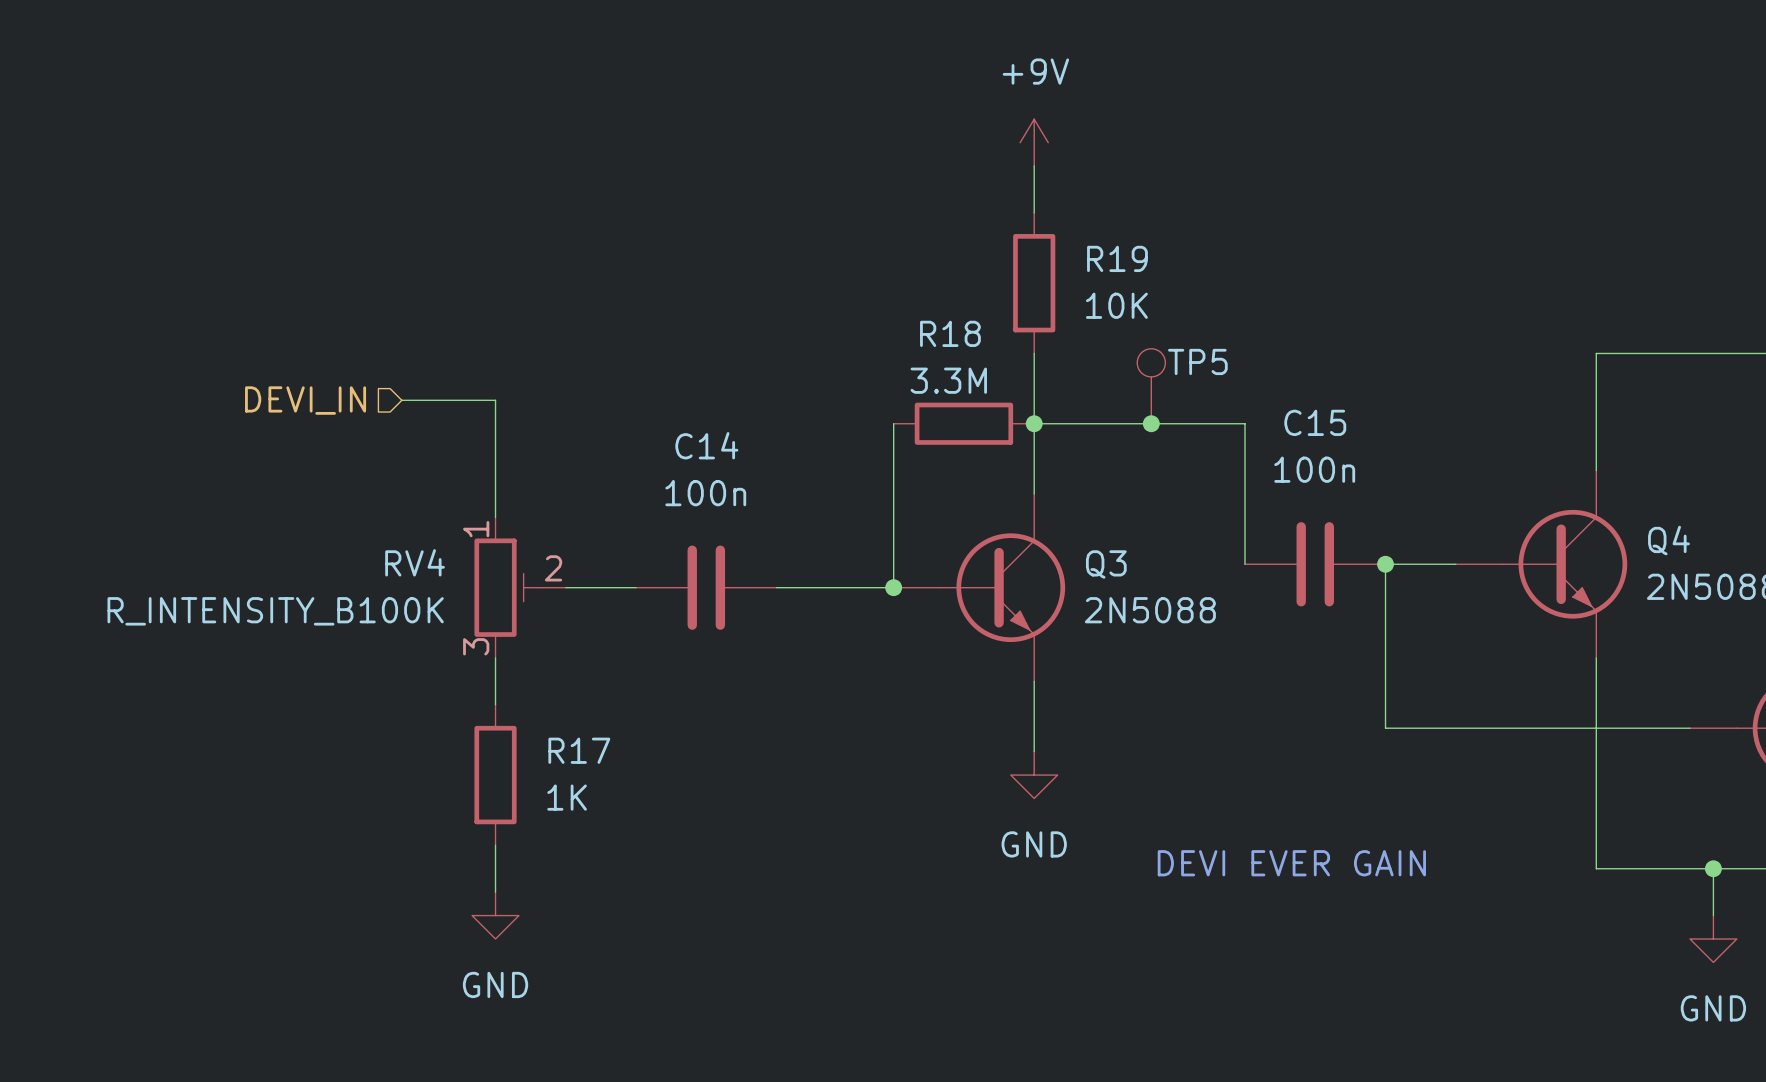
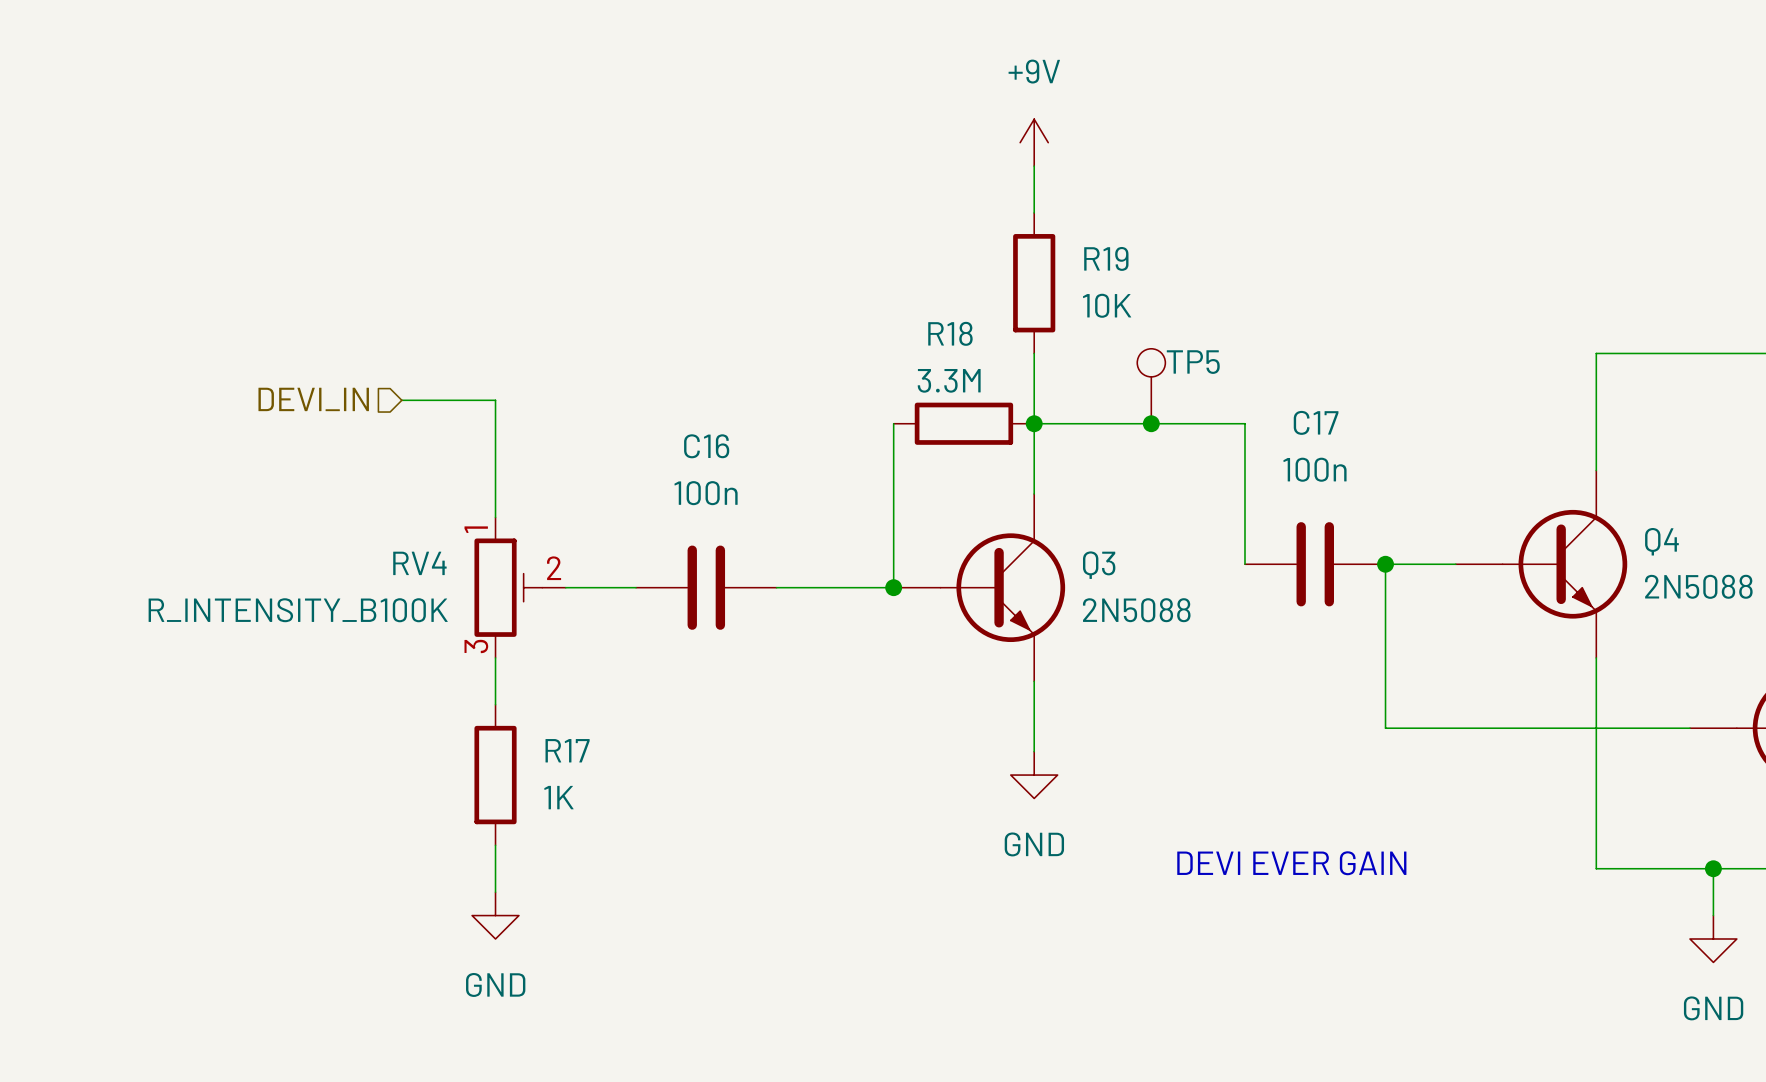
C15 name: C15 (1315, 422) -> C17 (1316, 422)
C14 name: C14 (706, 445) -> C16 (706, 446)

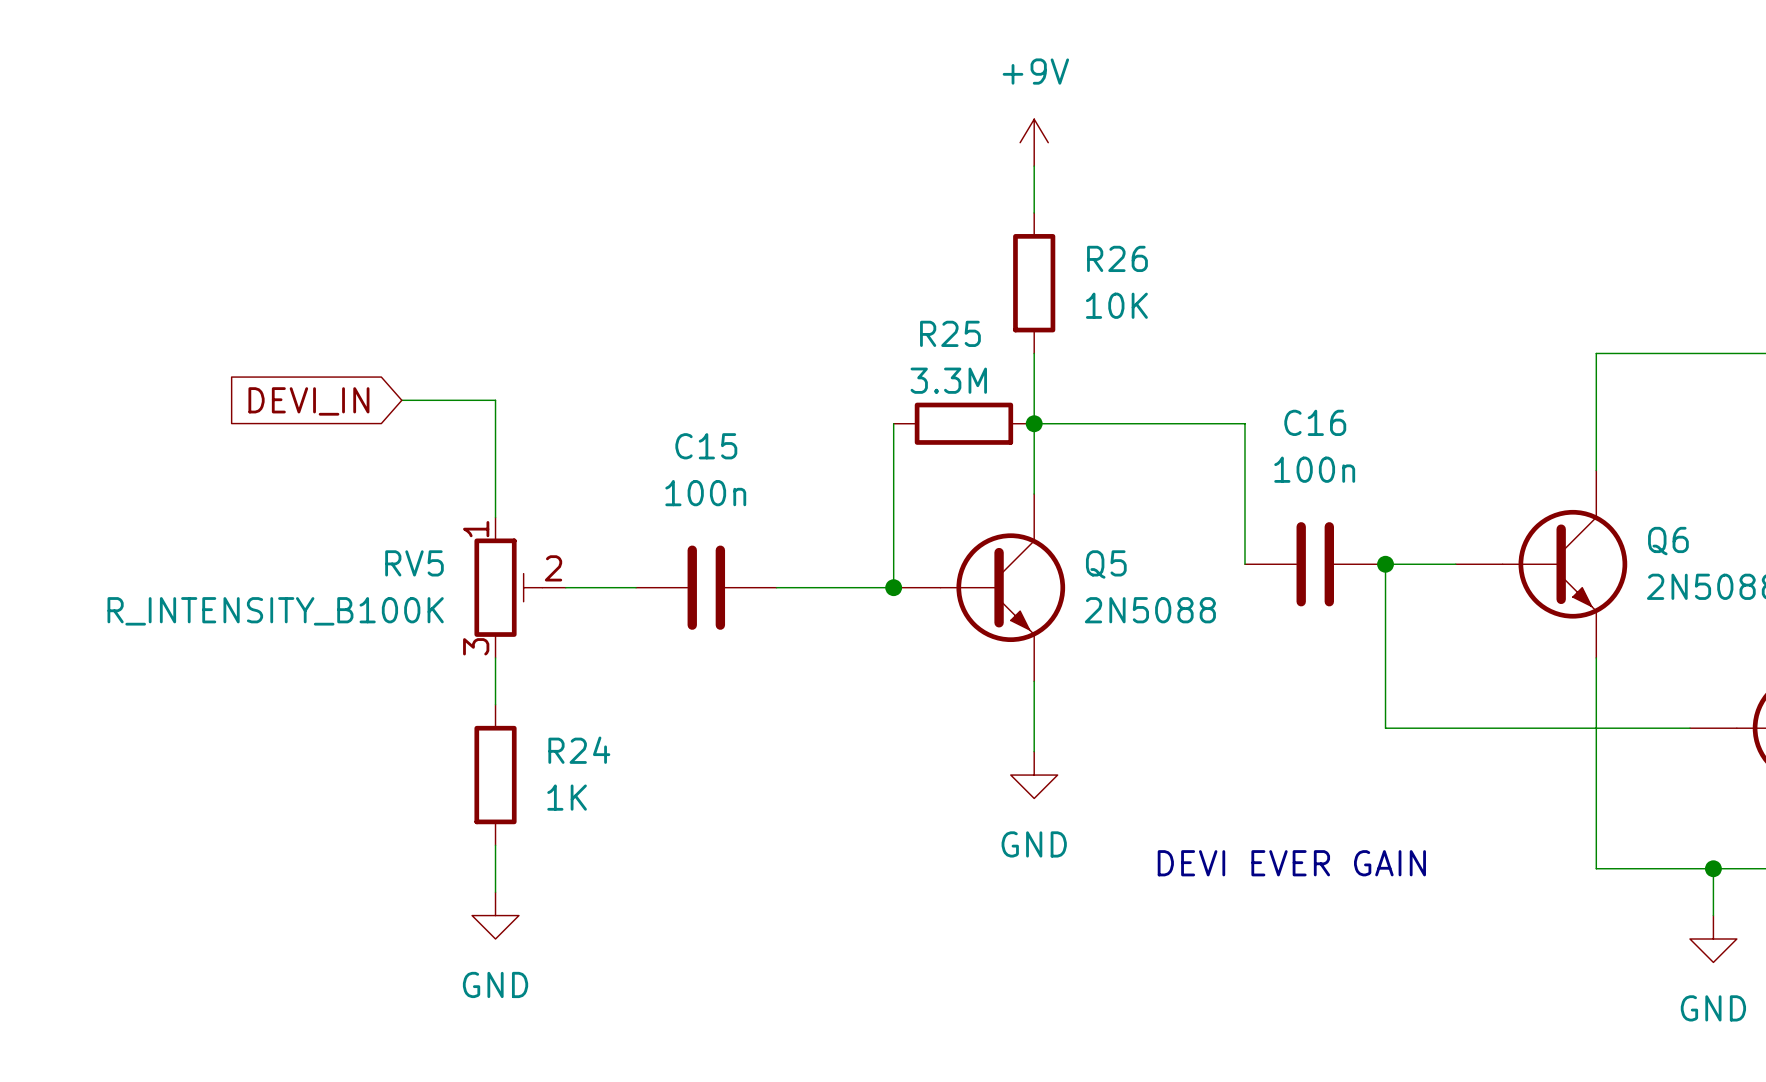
R19 name: R19 (1106, 258) -> R26 (1117, 258)
R18 name: R18 (950, 333) -> R25 (950, 333)
TP5: (1151, 386) -> none
hierarchical label: DEVI_IN (313, 399) -> none
global label: none -> DEVI_IN (308, 401)
C17 name: C17 (1316, 422) -> C16 (1315, 422)
junction: (1151, 423) -> none
C16 name: C16 (706, 446) -> C15 (706, 446)
Q4 name: Q4 (1661, 541) -> Q6 (1668, 541)
RV4 name: RV4 (419, 563) -> RV5 (414, 563)
Q3 name: Q3 (1099, 565) -> Q5 (1106, 564)
R17 name: R17 (567, 750) -> R24 (579, 750)

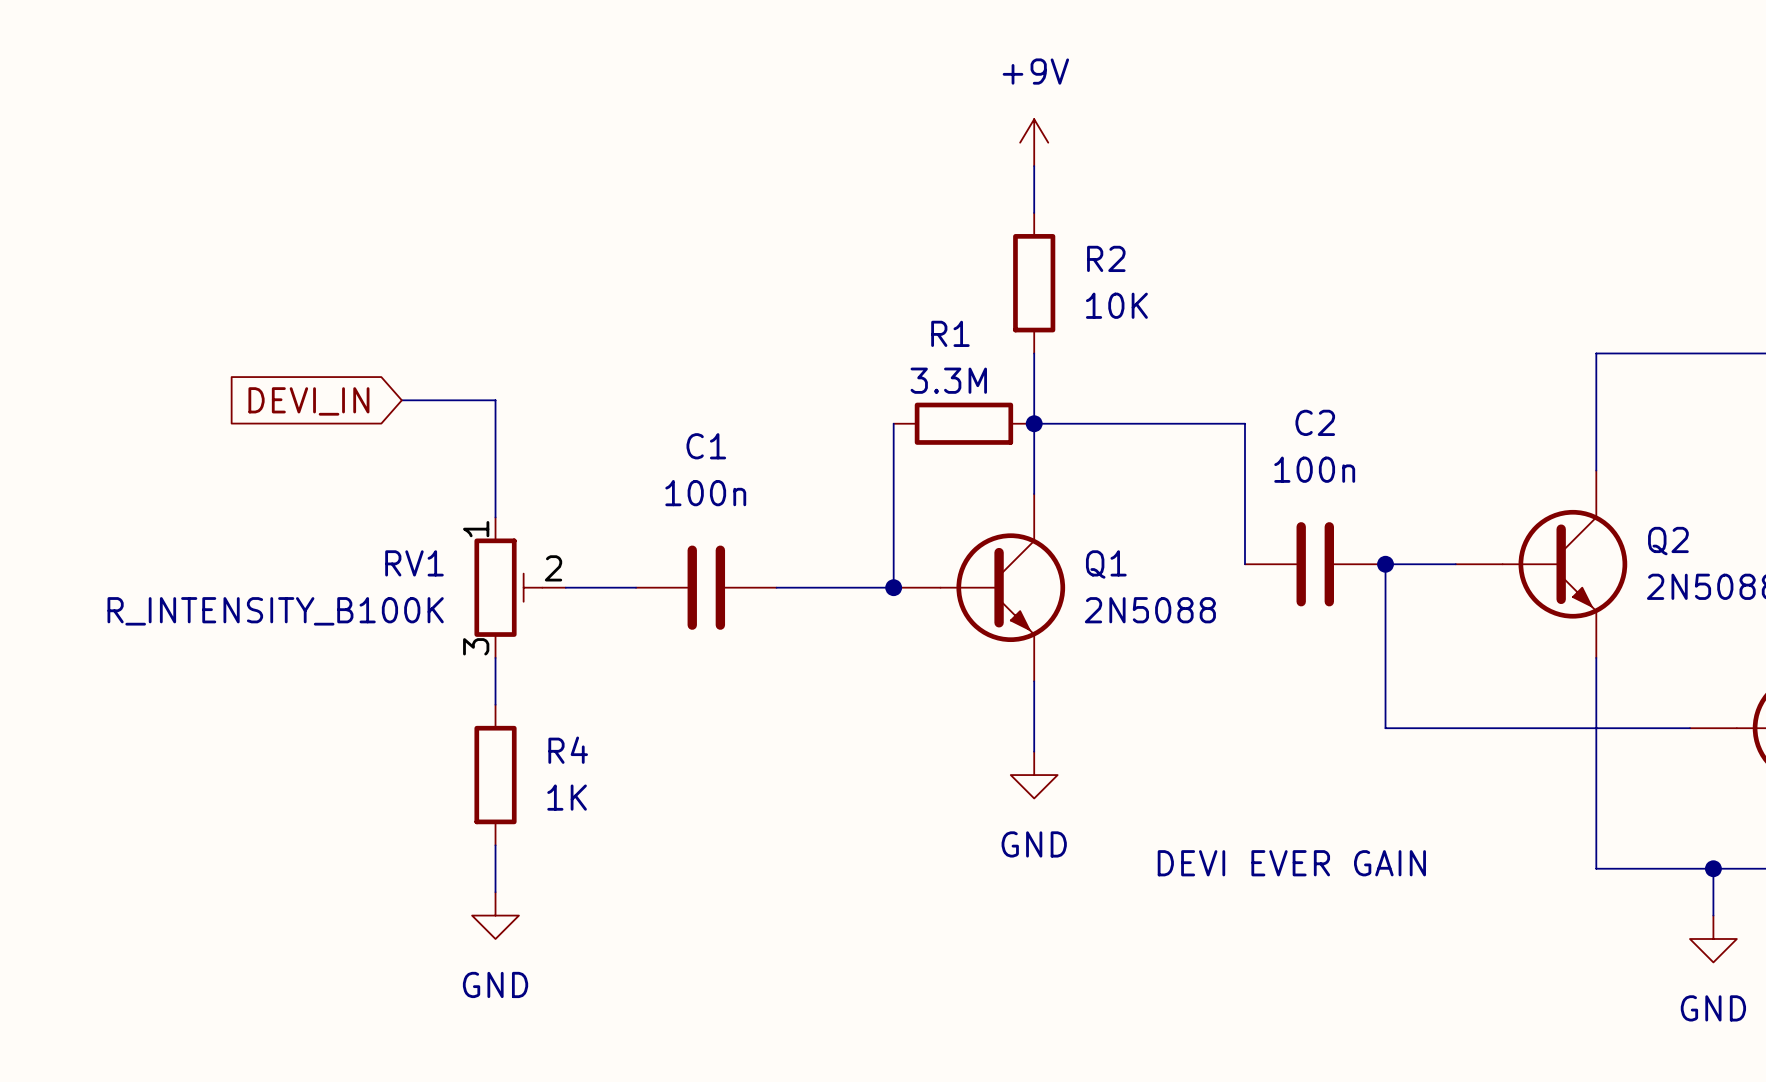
R26 name: R26 (1117, 258) -> R2 (1106, 258)
R25 name: R25 (950, 333) -> R1 (950, 333)
C16 name: C16 (1315, 422) -> C2 (1315, 422)
C15 name: C15 (706, 446) -> C1 (706, 446)
Q6 name: Q6 (1668, 541) -> Q2 (1668, 541)
RV5 name: RV5 (414, 563) -> RV1 (414, 563)
Q5 name: Q5 (1106, 564) -> Q1 (1106, 564)
R24 name: R24 (579, 750) -> R4 (568, 750)

